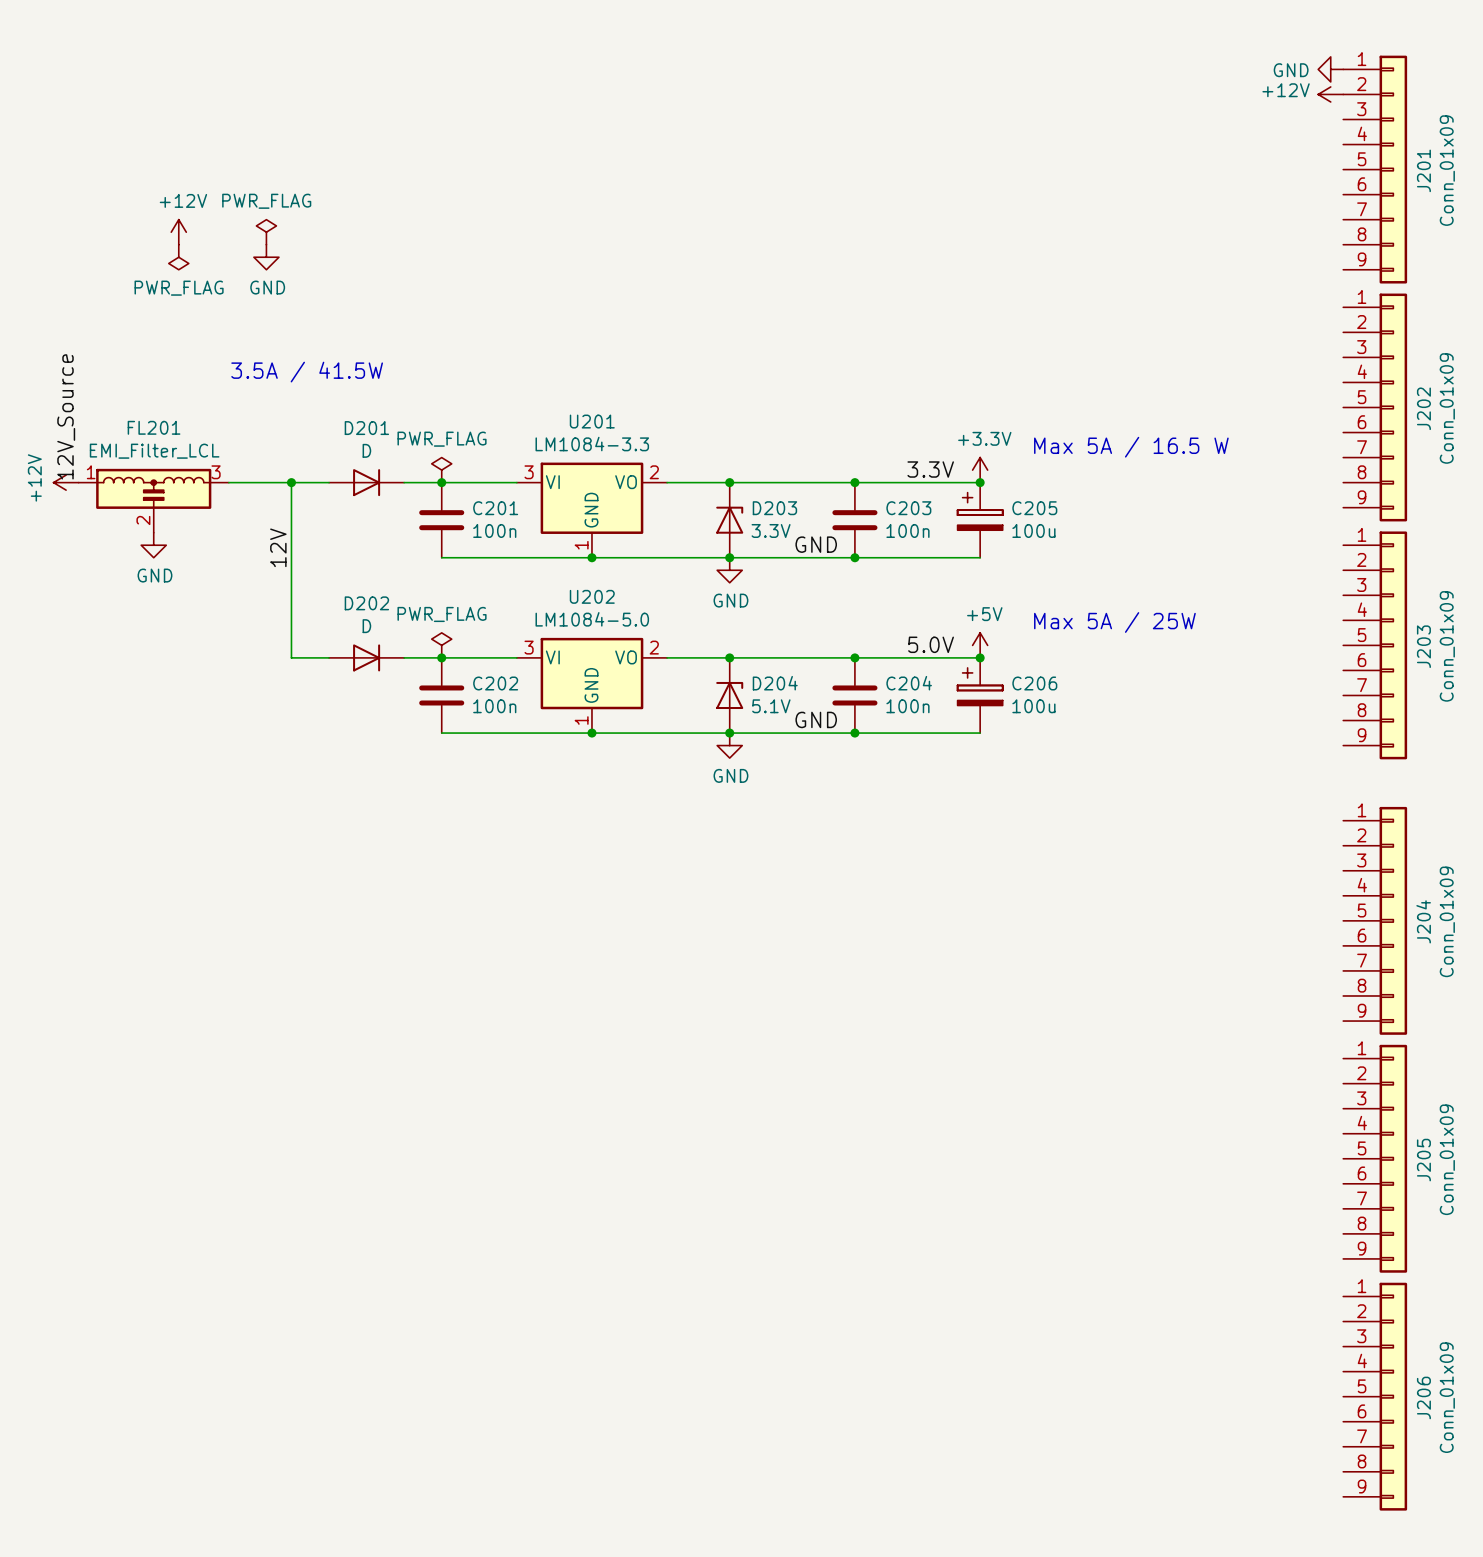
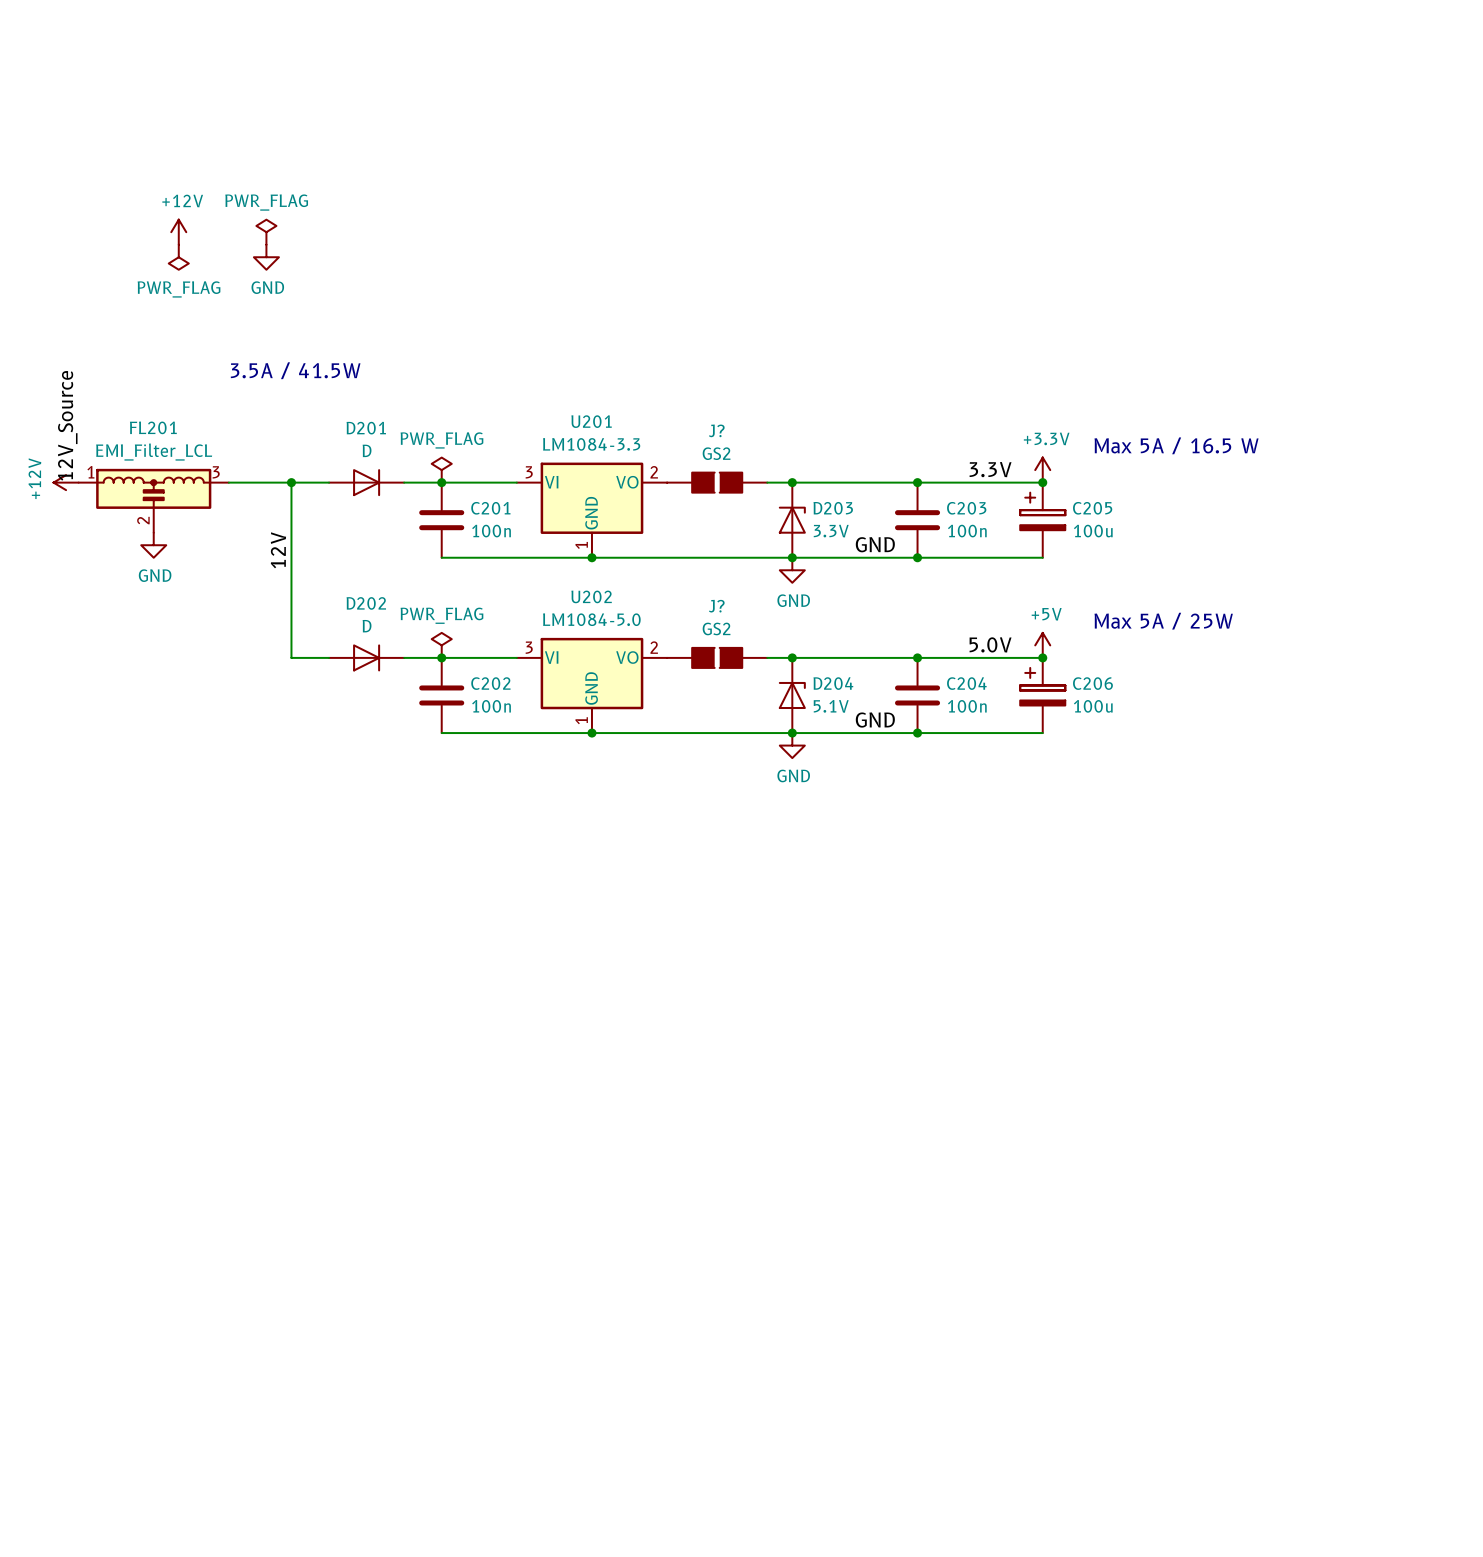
power symbol: GND (1330, 69) -> none
power symbol: +12V (1330, 94) -> none
J201: Conn_01x09 (1375, 169) -> none
J202: Conn_01x09 (1375, 407) -> none
text position: Max 5A / 16.5 W (1131, 447) -> Max 5A / 16.5 W (1176, 445)
label position: 3.3V (930, 469) -> 3.3V (990, 469)
power symbol position: +3.3V (980, 470) -> +3.3V (1042, 470)
J?: none -> GS2 (717, 482)
junction: (729, 482) -> none
junction: none -> (792, 482)
junction: (854, 482) -> none
junction: none -> (917, 482)
wire: none -> (980, 482) (1042, 482)
junction: (980, 482) -> none
junction: none -> (1042, 482)
D203 position: (729, 520) -> (792, 520)
C203 position: (854, 520) -> (917, 520)
C205 position: (980, 520) -> (1042, 520)
label position: GND (816, 544) -> GND (875, 544)
junction: (729, 557) -> none
junction: none -> (792, 557)
junction: (854, 557) -> none
junction: none -> (917, 557)
wire: none -> (980, 557) (1042, 557)
power symbol position: GND (729, 570) -> GND (792, 570)
text position: Max 5A / 25W (1114, 622) -> Max 5A / 25W (1163, 621)
label position: 5.0V (931, 644) -> 5.0V (990, 644)
power symbol position: +5V (980, 645) -> +5V (1042, 645)
J203: Conn_01x09 (1375, 645) -> none
J?: none -> GS2 (717, 657)
junction: (729, 657) -> none
junction: none -> (792, 657)
junction: (854, 657) -> none
junction: none -> (917, 657)
wire: none -> (980, 657) (1042, 657)
junction: (980, 657) -> none
junction: none -> (1042, 657)
D204 position: (729, 695) -> (792, 695)
C204 position: (854, 695) -> (917, 695)
C206 position: (980, 695) -> (1042, 695)
label position: GND (816, 719) -> GND (875, 720)
junction: (729, 733) -> none
junction: none -> (792, 733)
junction: (854, 733) -> none
junction: none -> (917, 733)
wire: none -> (980, 733) (1042, 733)
power symbol position: GND (729, 745) -> GND (792, 745)
J204: Conn_01x09 (1375, 920) -> none
J205: Conn_01x09 (1375, 1158) -> none
J206: Conn_01x09 (1375, 1396) -> none

